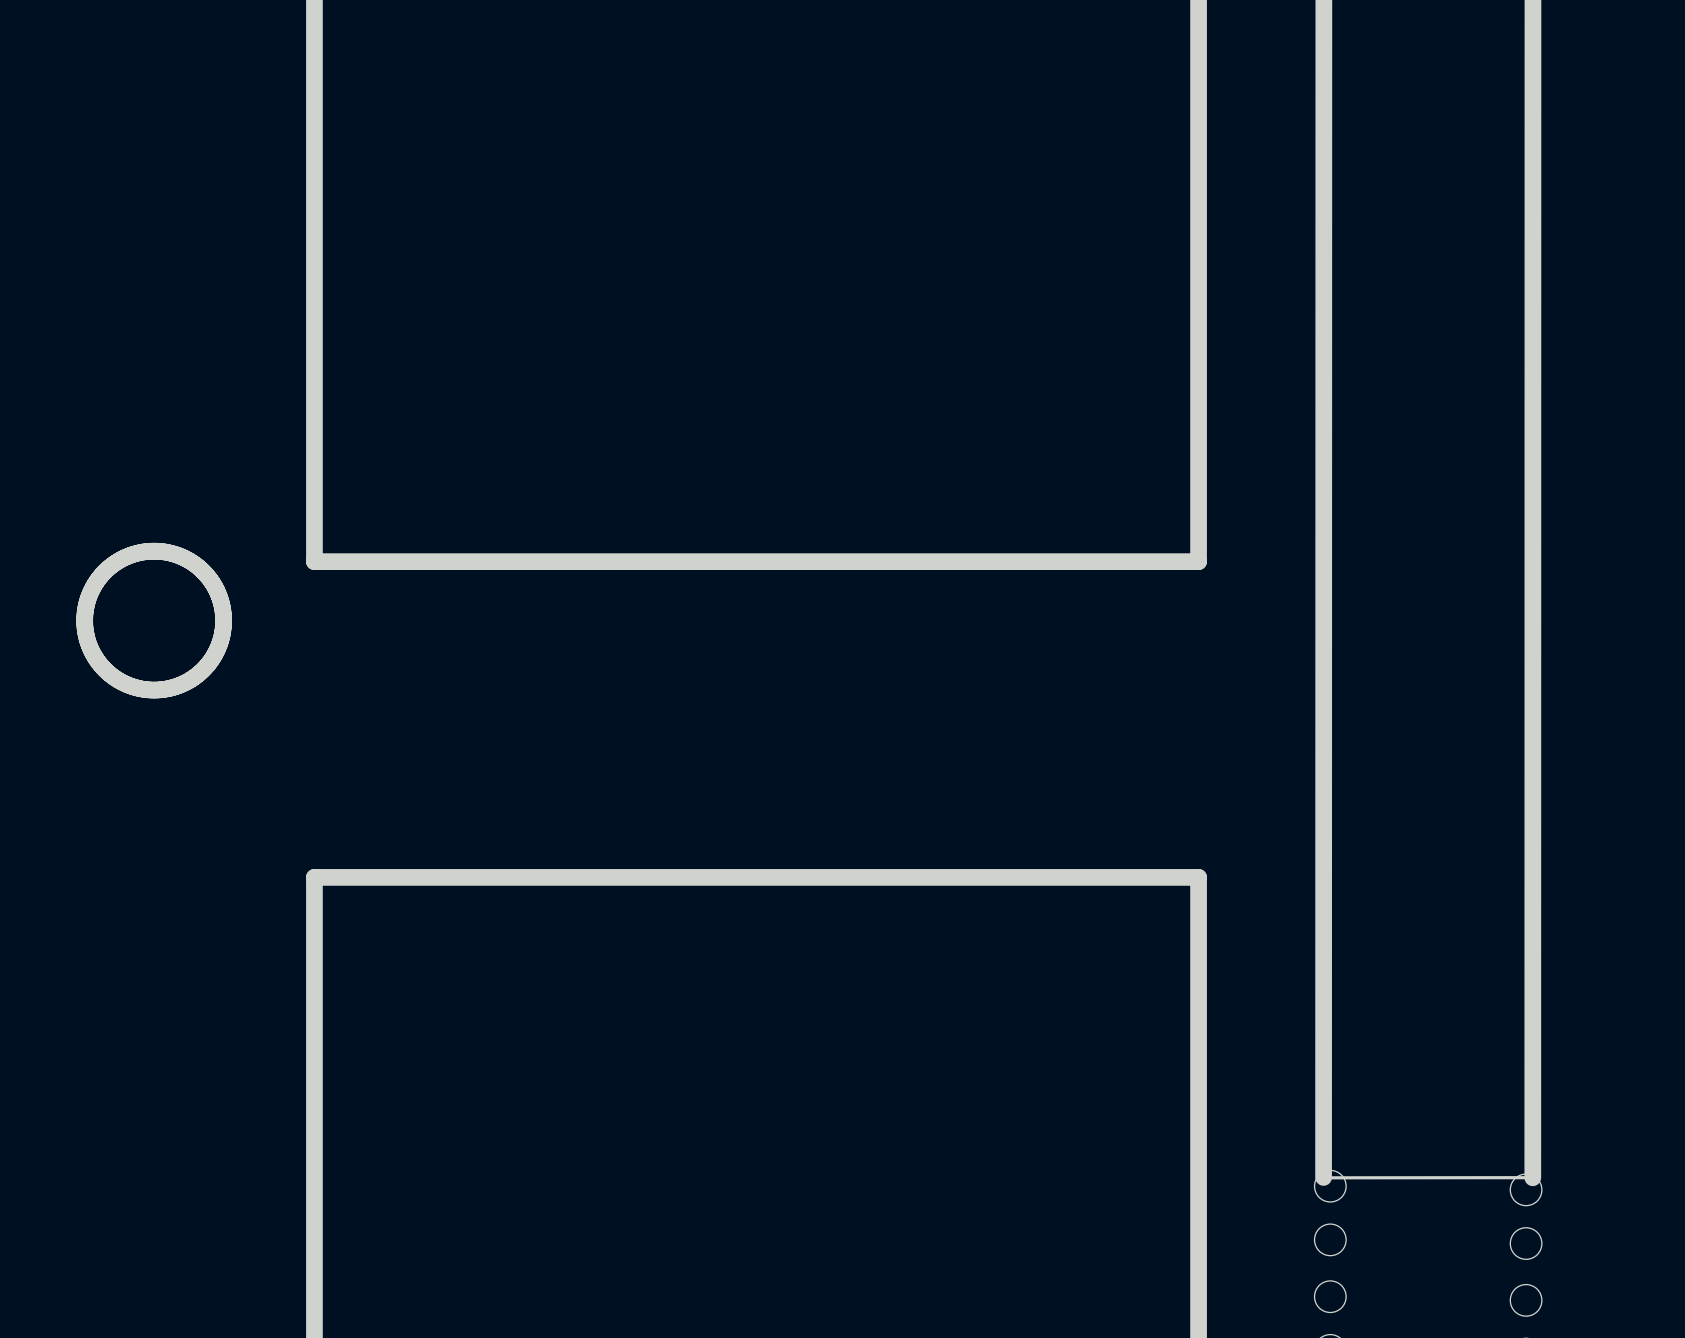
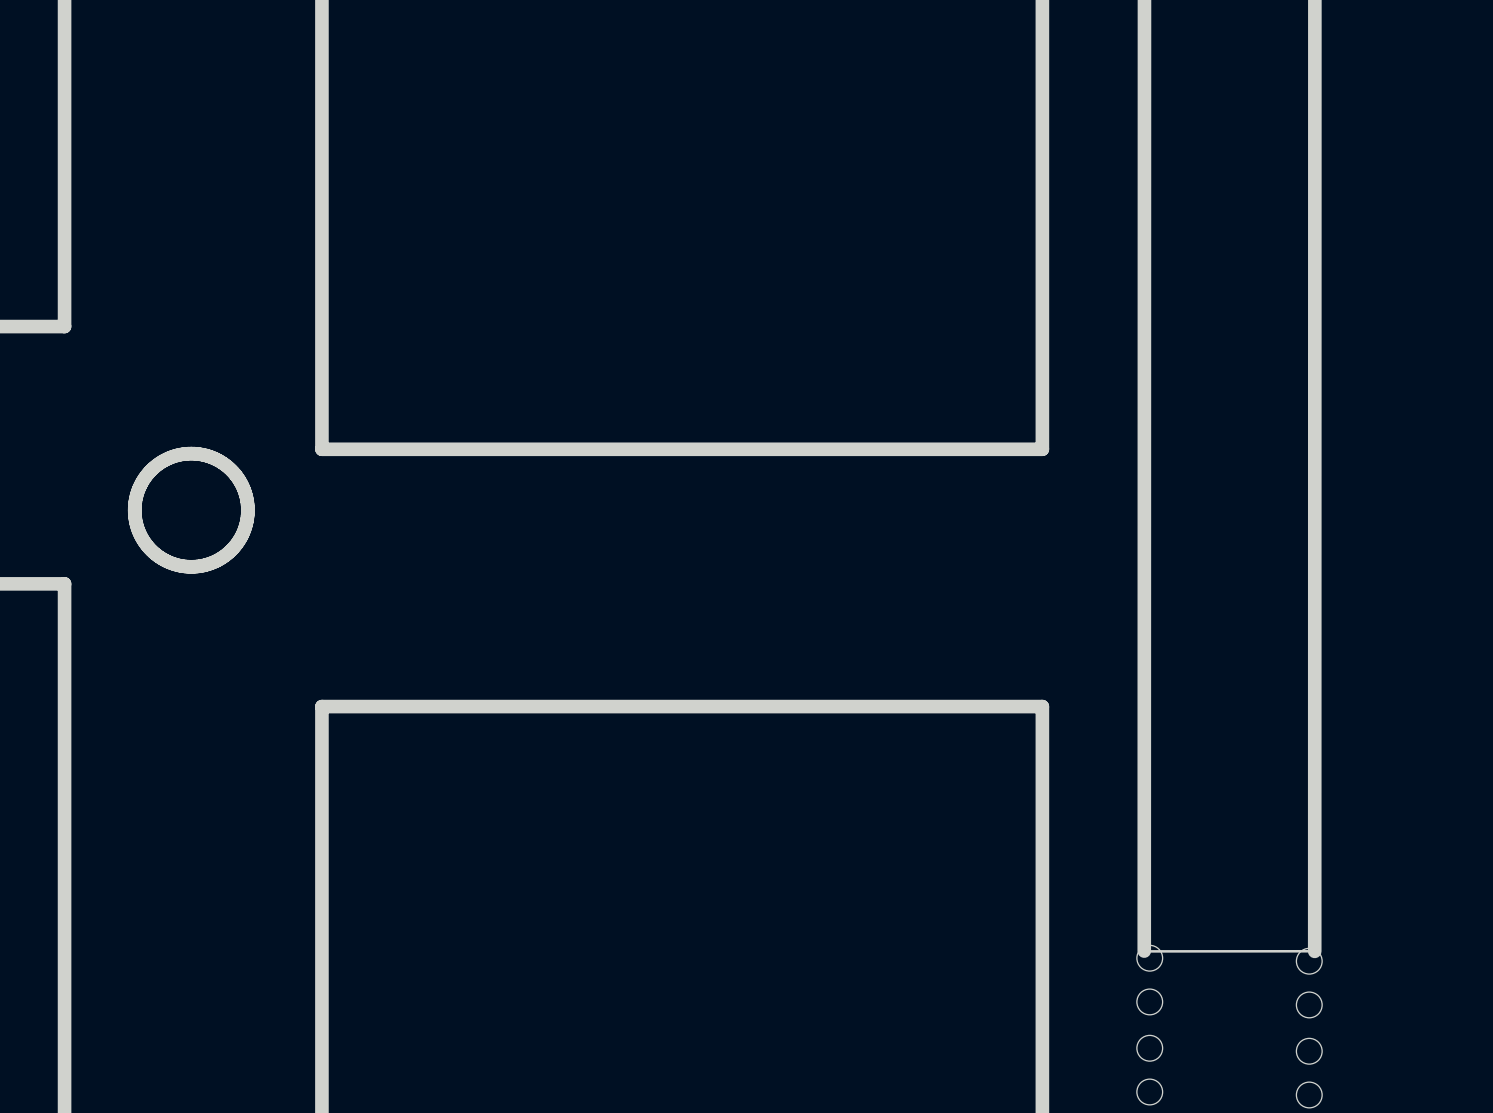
board edge: (147, 551) (121, 559) (100, 576) (87, 599) (85, 627) (93, 653) (109, 674) (133, 686) (161, 689) (187, 681) (207, 664) (220, 641) (223, 613) (215, 587) (198, 567) (174, 554) (147, 551) -> (185, 453) (164, 460) (147, 474) (137, 493) (134, 516) (141, 537) (155, 553) (174, 564) (197, 566) (218, 559) (234, 546) (245, 527) (247, 504) (241, 483) (227, 466) (208, 456) (185, 453)

